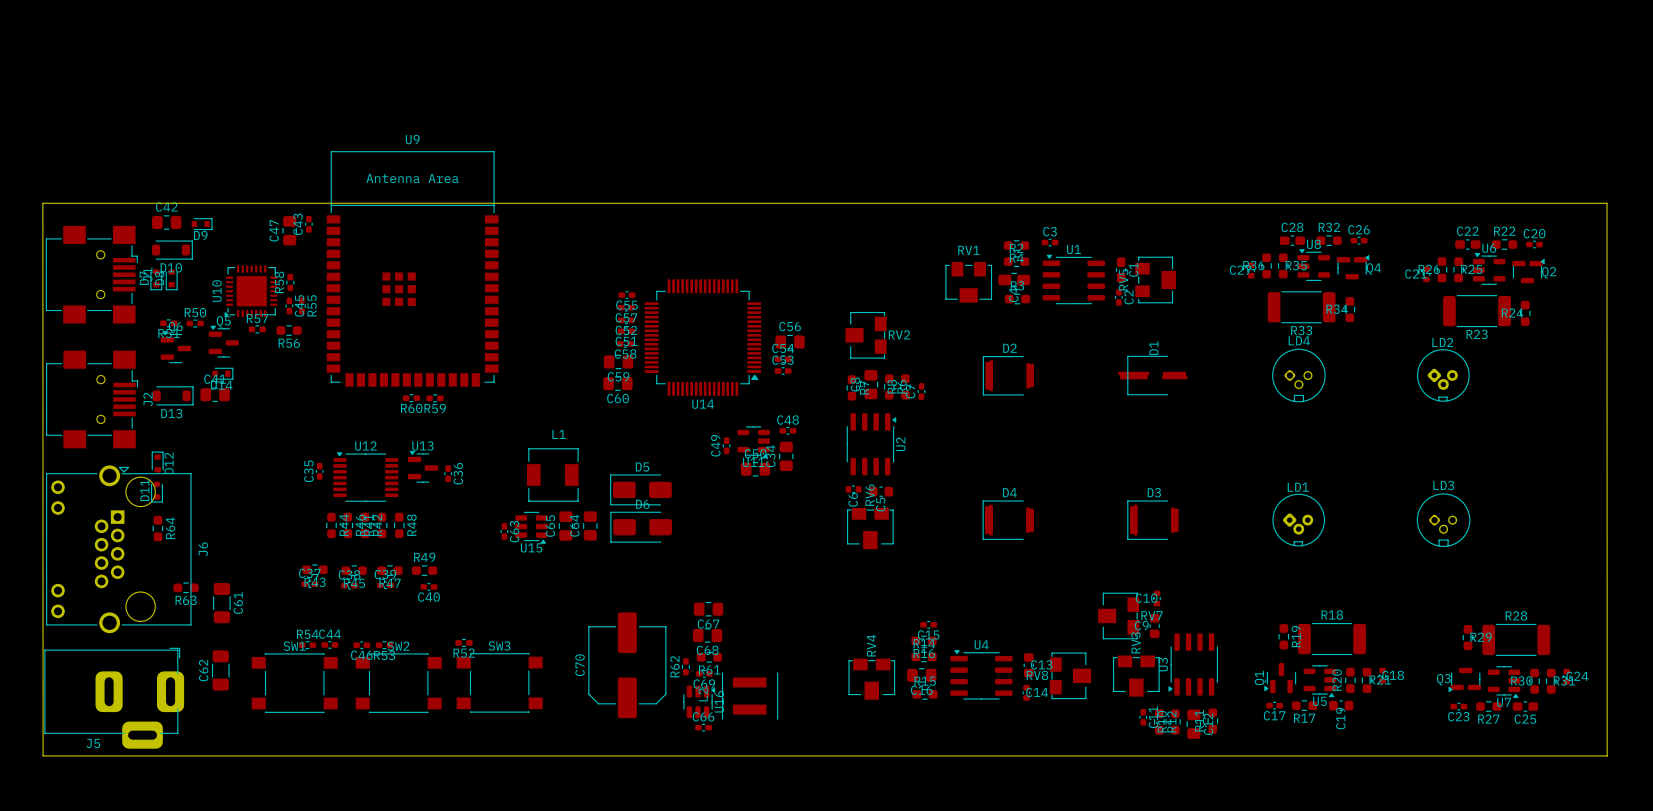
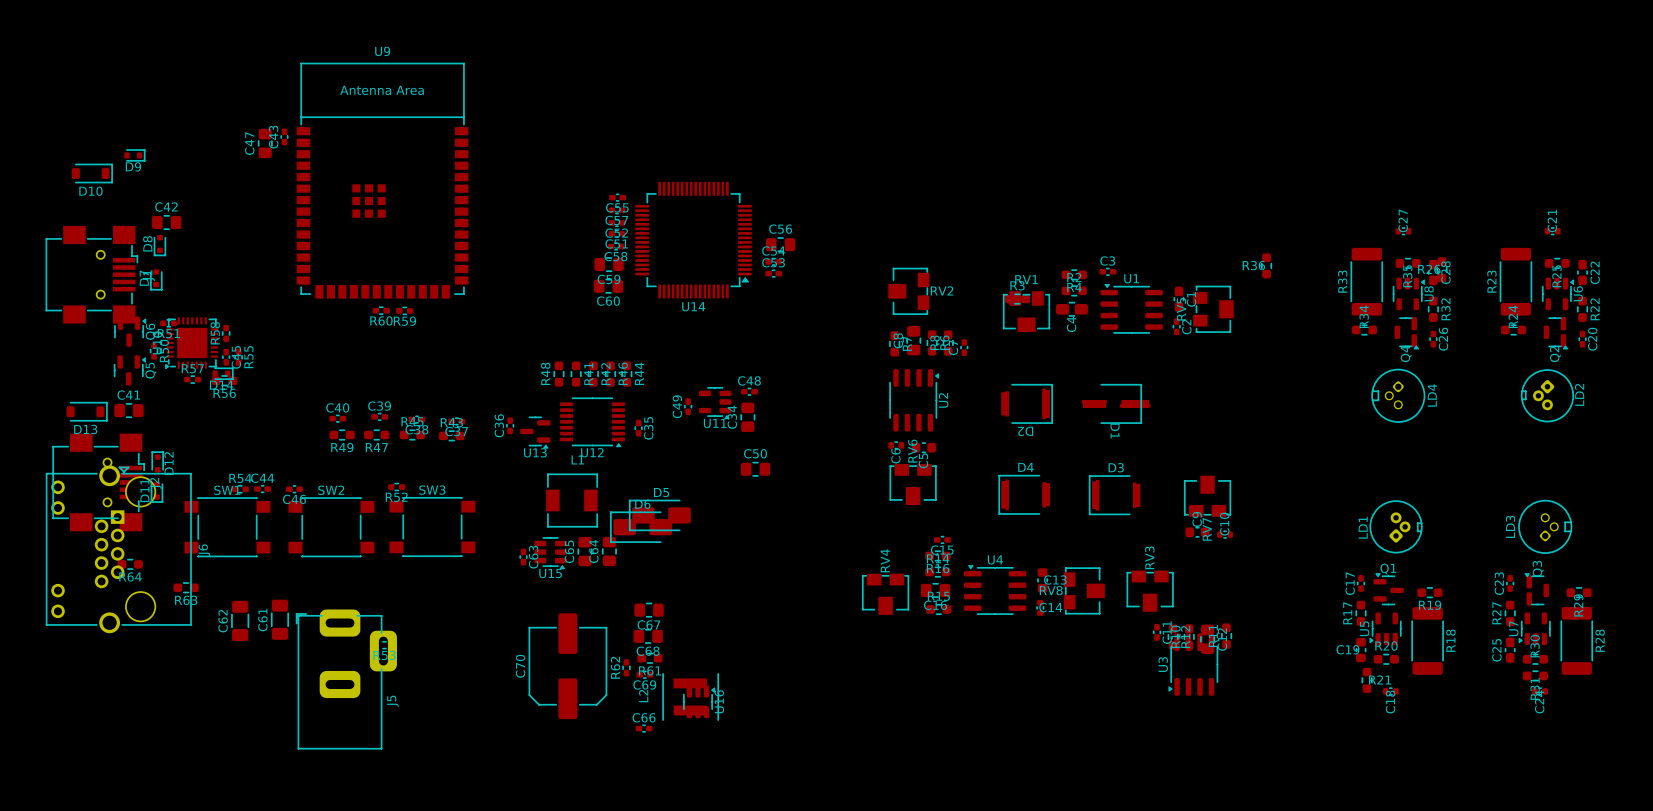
board edge: (42, 203) (43, 755) (1607, 755) (1606, 203) (42, 203) -> none
D9 position: (202, 224) -> (134, 155)
C43 position: (308, 224) -> (284, 136)
C47 position: (289, 230) -> (265, 143)
C28 rotation: 0° (1292, 240) -> 90° clockwise (1433, 272)
C28 position: (1292, 240) -> (1433, 272)
R32 rotation: 0° (1329, 240) -> 90° clockwise (1433, 309)
R32 position: (1329, 240) -> (1433, 309)
C26 rotation: 0° (1359, 240) -> 90° clockwise (1433, 339)
C26 position: (1359, 240) -> (1433, 339)
C3 position: (1050, 242) -> (1107, 271)
C22 rotation: 0° (1467, 244) -> 90° clockwise (1582, 272)
C22 position: (1467, 244) -> (1582, 272)
R22 rotation: 0° (1504, 244) -> 90° clockwise (1582, 309)
R22 position: (1504, 244) -> (1582, 309)
C20 rotation: 0° (1534, 244) -> 90° clockwise (1582, 339)
C20 position: (1534, 244) -> (1582, 339)
R4 position: (1016, 245) -> (1074, 274)
D10 position: (172, 250) -> (92, 173)
R2 position: (1016, 261) -> (1074, 290)
R35 rotation: 0° (1283, 265) -> 90° clockwise (1408, 263)
R35 position: (1283, 265) -> (1408, 263)
U8 rotation: 0° (1313, 265) -> 90° clockwise (1408, 293)
U8 position: (1313, 265) -> (1408, 293)
Q4 rotation: 0° (1353, 267) -> 90° clockwise (1406, 333)
Q4 position: (1353, 267) -> (1406, 333)
U9 position: (412, 268) -> (382, 180)
U6 rotation: 0° (1489, 268) -> 90° clockwise (1558, 293)
U6 position: (1489, 268) -> (1558, 293)
C1 position: (1121, 269) -> (1178, 299)
R25 rotation: 0° (1458, 269) -> 90° clockwise (1557, 263)
R25 position: (1458, 269) -> (1557, 263)
C27 rotation: 0° (1251, 270) -> 90° clockwise (1403, 231)
C27 position: (1251, 270) -> (1403, 231)
Q2 rotation: 0° (1528, 271) -> 90° clockwise (1556, 333)
Q2 position: (1528, 271) -> (1556, 333)
C21 rotation: 0° (1426, 274) -> 90° clockwise (1552, 231)
C21 position: (1426, 274) -> (1552, 231)
D8 position: (171, 279) -> (159, 245)
U1 position: (1073, 279) -> (1131, 308)
C4 position: (1014, 280) -> (1071, 309)
RV5 position: (1155, 280) -> (1213, 309)
R58 position: (290, 282) -> (226, 333)
RV1 position: (968, 282) -> (1026, 311)
U10 position: (251, 291) -> (191, 343)
C55 position: (626, 295) -> (617, 197)
C2 position: (1118, 297) -> (1176, 326)
C45 position: (289, 305) -> (226, 357)
R55 position: (301, 305) -> (238, 357)
C57 position: (626, 307) -> (616, 210)
R33 rotation: 0° (1301, 307) -> 90° clockwise (1366, 281)
R33 position: (1301, 307) -> (1366, 281)
R34 rotation: 0° (1349, 309) -> 90° clockwise (1364, 329)
R34 position: (1349, 309) -> (1364, 329)
R23 rotation: 0° (1477, 311) -> 90° clockwise (1515, 281)
R23 position: (1477, 311) -> (1515, 281)
R24 rotation: 0° (1525, 313) -> 90° clockwise (1513, 329)
R24 position: (1525, 313) -> (1513, 329)
C52 position: (626, 320) -> (616, 222)
R50 rotation: 0° (195, 323) -> 90° clockwise (154, 351)
R50 position: (195, 323) -> (154, 351)
R57 position: (257, 329) -> (192, 379)
R56 position: (289, 330) -> (224, 380)
C51 position: (626, 331) -> (616, 233)
RV2 position: (866, 335) -> (908, 291)
U14 position: (702, 337) -> (693, 240)
Q5 rotation: 0° (223, 341) -> 90° clockwise (130, 370)
Q5 position: (223, 341) -> (130, 370)
C56 position: (790, 342) -> (780, 244)
C58 position: (625, 343) -> (616, 246)
Q6 rotation: 0° (175, 347) -> 90° clockwise (130, 331)
Q6 position: (175, 347) -> (130, 331)
C54 position: (783, 359) -> (773, 261)
C59 position: (618, 361) -> (609, 264)
C53 position: (783, 371) -> (773, 273)
D2 rotation: 0° (1008, 375) -> 180° (1027, 403)
D2 position: (1008, 375) -> (1027, 403)
D1 rotation: 0° (1152, 375) -> 180° (1116, 403)
D1 position: (1152, 375) -> (1116, 403)
LD4 rotation: 0° (1298, 375) -> 90° clockwise (1398, 395)
LD4 position: (1298, 375) -> (1398, 395)
LD2 rotation: 0° (1443, 375) -> 90° clockwise (1547, 395)
LD2 position: (1443, 375) -> (1547, 395)
C60 position: (617, 383) -> (608, 286)
C8 position: (870, 384) -> (913, 340)
R6 position: (889, 386) -> (932, 342)
R8 position: (905, 386) -> (948, 342)
R7 position: (851, 387) -> (894, 343)
C7 position: (921, 391) -> (964, 347)
C41 position: (215, 394) -> (128, 410)
D13 position: (173, 395) -> (87, 411)
R60 position: (411, 398) -> (381, 310)
R59 position: (434, 398) -> (404, 310)
J2 position: (92, 399) -> (98, 482)
C48 position: (787, 430) -> (749, 391)
U11 position: (753, 442) -> (715, 403)
U2 position: (871, 444) -> (914, 400)
C49 position: (726, 445) -> (688, 406)
C34 position: (786, 456) -> (747, 417)
U13 rotation: 0° (422, 466) -> 180° (535, 432)
U13 position: (422, 466) -> (535, 432)
C35 name position: C35 (308, 471) -> C35 (648, 428)
C35 position: (319, 471) -> (638, 428)
C36 position: (448, 473) -> (510, 425)
C36 name position: C36 (458, 473) -> C36 (499, 425)
L1 position: (552, 474) -> (571, 500)
U12 rotation: 0° (365, 477) -> 180° (592, 422)
U12 position: (365, 477) -> (592, 422)
D5 position: (640, 489) -> (660, 515)
C6 position: (853, 489) -> (896, 445)
C5 position: (881, 491) -> (923, 447)
D4 position: (1008, 520) -> (1024, 494)
D3 position: (1152, 520) -> (1114, 495)
LD1 rotation: 0° (1298, 520) -> 90° counterclockwise (1396, 526)
LD1 position: (1298, 520) -> (1396, 526)
LD3 rotation: 0° (1443, 520) -> 90° counterclockwise (1545, 526)
LD3 position: (1443, 520) -> (1545, 526)
R44 position: (331, 525) -> (626, 374)
R46 position: (347, 525) -> (610, 374)
R42 position: (364, 525) -> (593, 374)
R41 name position: R41 (368, 525) -> R41 (588, 374)
R41 position: (382, 525) -> (576, 374)
R48 position: (399, 525) -> (558, 374)
R48 name position: R48 (411, 525) -> R48 (545, 373)
C64 position: (590, 525) -> (609, 551)
C65 position: (565, 526) -> (584, 551)
U15 position: (531, 527) -> (550, 553)
R64 rotation: 0° (157, 528) -> 90° clockwise (130, 564)
R64 position: (157, 528) -> (130, 564)
RV6 position: (870, 528) -> (913, 484)
C63 position: (504, 531) -> (523, 557)
R49 name position: R49 (424, 557) -> R49 (342, 447)
R43 position: (314, 569) -> (451, 435)
R45 position: (354, 570) -> (412, 434)
R47 position: (389, 570) -> (376, 434)
R49 position: (424, 570) -> (342, 434)
C37 name position: C37 (309, 573) -> C37 (456, 431)
C38 name position: C38 (349, 574) -> C38 (416, 429)
R43 name position: R43 (315, 582) -> R43 (451, 422)
R45 name position: R45 (354, 583) -> R45 (412, 421)
C37 position: (309, 584) -> (456, 421)
C38 position: (349, 585) -> (416, 419)
C39 position: (385, 585) -> (379, 416)
C40 position: (428, 586) -> (337, 418)
C40 name position: C40 (428, 597) -> C40 (337, 407)
C10 rotation: 0° (1156, 598) -> 90° clockwise (1225, 534)
C10 position: (1156, 598) -> (1225, 534)
C61 name position: C61 (238, 602) -> C61 (262, 619)
C61 position: (221, 603) -> (279, 619)
C67 position: (708, 609) -> (649, 610)
RV7 rotation: 0° (1118, 615) -> 90° clockwise (1207, 496)
RV7 position: (1118, 615) -> (1207, 496)
C15 position: (928, 624) -> (942, 539)
C9 rotation: 0° (1154, 626) -> 90° clockwise (1197, 532)
C9 position: (1154, 626) -> (1197, 532)
C68 position: (707, 635) -> (648, 636)
R19 rotation: 0° (1283, 636) -> 90° clockwise (1429, 592)
R19 position: (1283, 636) -> (1429, 592)
R29 rotation: 0° (1467, 637) -> 90° clockwise (1579, 592)
R29 position: (1467, 637) -> (1579, 592)
R18 rotation: 0° (1332, 639) -> 90° clockwise (1427, 640)
R18 position: (1332, 639) -> (1427, 640)
R28 rotation: 0° (1516, 639) -> 90° clockwise (1576, 640)
R28 position: (1516, 639) -> (1576, 640)
R16 position: (924, 640) -> (937, 555)
R52 position: (463, 642) -> (396, 487)
C44 position: (329, 644) -> (262, 489)
R54 position: (307, 645) -> (240, 489)
C46 position: (361, 645) -> (294, 489)
R14 position: (924, 656) -> (937, 572)
R61 position: (709, 657) -> (649, 658)
C70 position: (627, 665) -> (567, 666)
C13 position: (1028, 665) -> (1042, 580)
R62 position: (685, 666) -> (626, 667)
C62 position: (220, 670) -> (240, 620)
C69 position: (704, 673) -> (644, 674)
U4 position: (981, 674) -> (995, 589)
C16 position: (921, 675) -> (935, 590)
RV8 position: (1070, 675) -> (1084, 590)
C18 rotation: 0° (1382, 675) -> 90° clockwise (1390, 691)
C18 position: (1382, 675) -> (1390, 691)
RV3 position: (1136, 676) -> (1150, 591)
C24 rotation: 0° (1566, 676) -> 90° clockwise (1540, 691)
C24 position: (1566, 676) -> (1540, 691)
Q1 rotation: 0° (1280, 678) -> 90° clockwise (1388, 589)
Q1 position: (1280, 678) -> (1388, 589)
RV4 position: (871, 679) -> (885, 594)
Q3 rotation: 0° (1464, 679) -> 90° clockwise (1536, 589)
Q3 position: (1464, 679) -> (1536, 589)
R20 rotation: 0° (1350, 680) -> 90° clockwise (1386, 659)
R20 position: (1350, 680) -> (1386, 659)
U5 rotation: 0° (1319, 681) -> 90° clockwise (1385, 628)
U5 position: (1319, 681) -> (1385, 628)
R30 rotation: 0° (1534, 681) -> 90° clockwise (1535, 659)
R30 position: (1534, 681) -> (1535, 659)
R31 rotation: 0° (1551, 681) -> 90° clockwise (1535, 675)
R31 position: (1551, 681) -> (1535, 675)
SW3 position: (499, 682) -> (432, 527)
U7 rotation: 0° (1504, 682) -> 90° clockwise (1534, 628)
U7 position: (1504, 682) -> (1534, 628)
SW1 position: (294, 683) -> (227, 527)
SW2 position: (398, 683) -> (331, 527)
C14 position: (1026, 692) -> (1040, 607)
R15 position: (925, 694) -> (938, 609)
L2 position: (750, 696) -> (690, 696)
J5 rotation: 0° (114, 698) -> 90° counterclockwise (346, 679)
J5 position: (114, 698) -> (346, 679)
C17 rotation: 0° (1274, 705) -> 90° clockwise (1360, 583)
C17 position: (1274, 705) -> (1360, 583)
R17 rotation: 0° (1304, 705) -> 90° clockwise (1360, 613)
R17 position: (1304, 705) -> (1360, 613)
C19 rotation: 0° (1341, 705) -> 90° clockwise (1360, 650)
C19 position: (1341, 705) -> (1360, 650)
C23 rotation: 0° (1458, 706) -> 90° clockwise (1510, 583)
C23 position: (1458, 706) -> (1510, 583)
R27 rotation: 0° (1488, 706) -> 90° clockwise (1510, 613)
R27 position: (1488, 706) -> (1510, 613)
C25 rotation: 0° (1525, 706) -> 90° clockwise (1510, 650)
C25 position: (1525, 706) -> (1510, 650)
C11 position: (1143, 717) -> (1157, 632)
R11 position: (1212, 720) -> (1226, 636)
R12 position: (1159, 721) -> (1173, 636)
R10 position: (1175, 721) -> (1189, 636)
C12 position: (1193, 724) -> (1207, 639)
C66 position: (703, 727) -> (644, 728)

